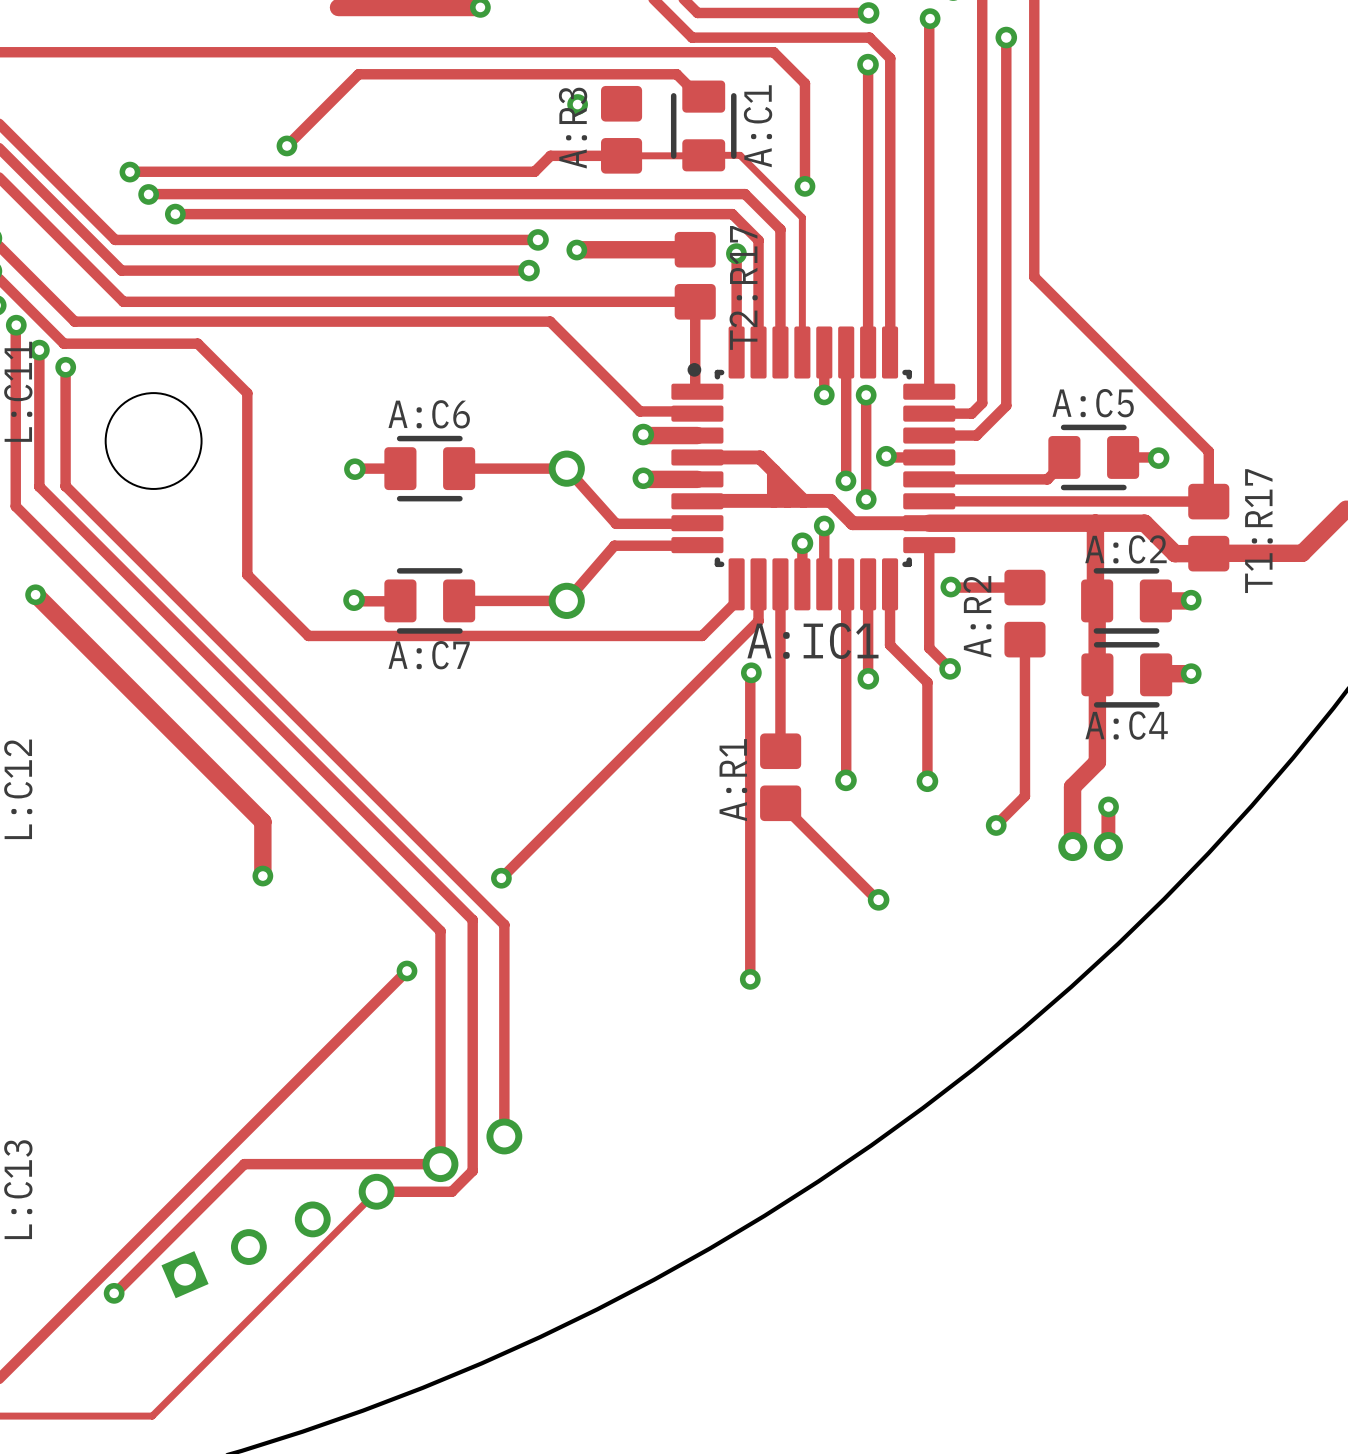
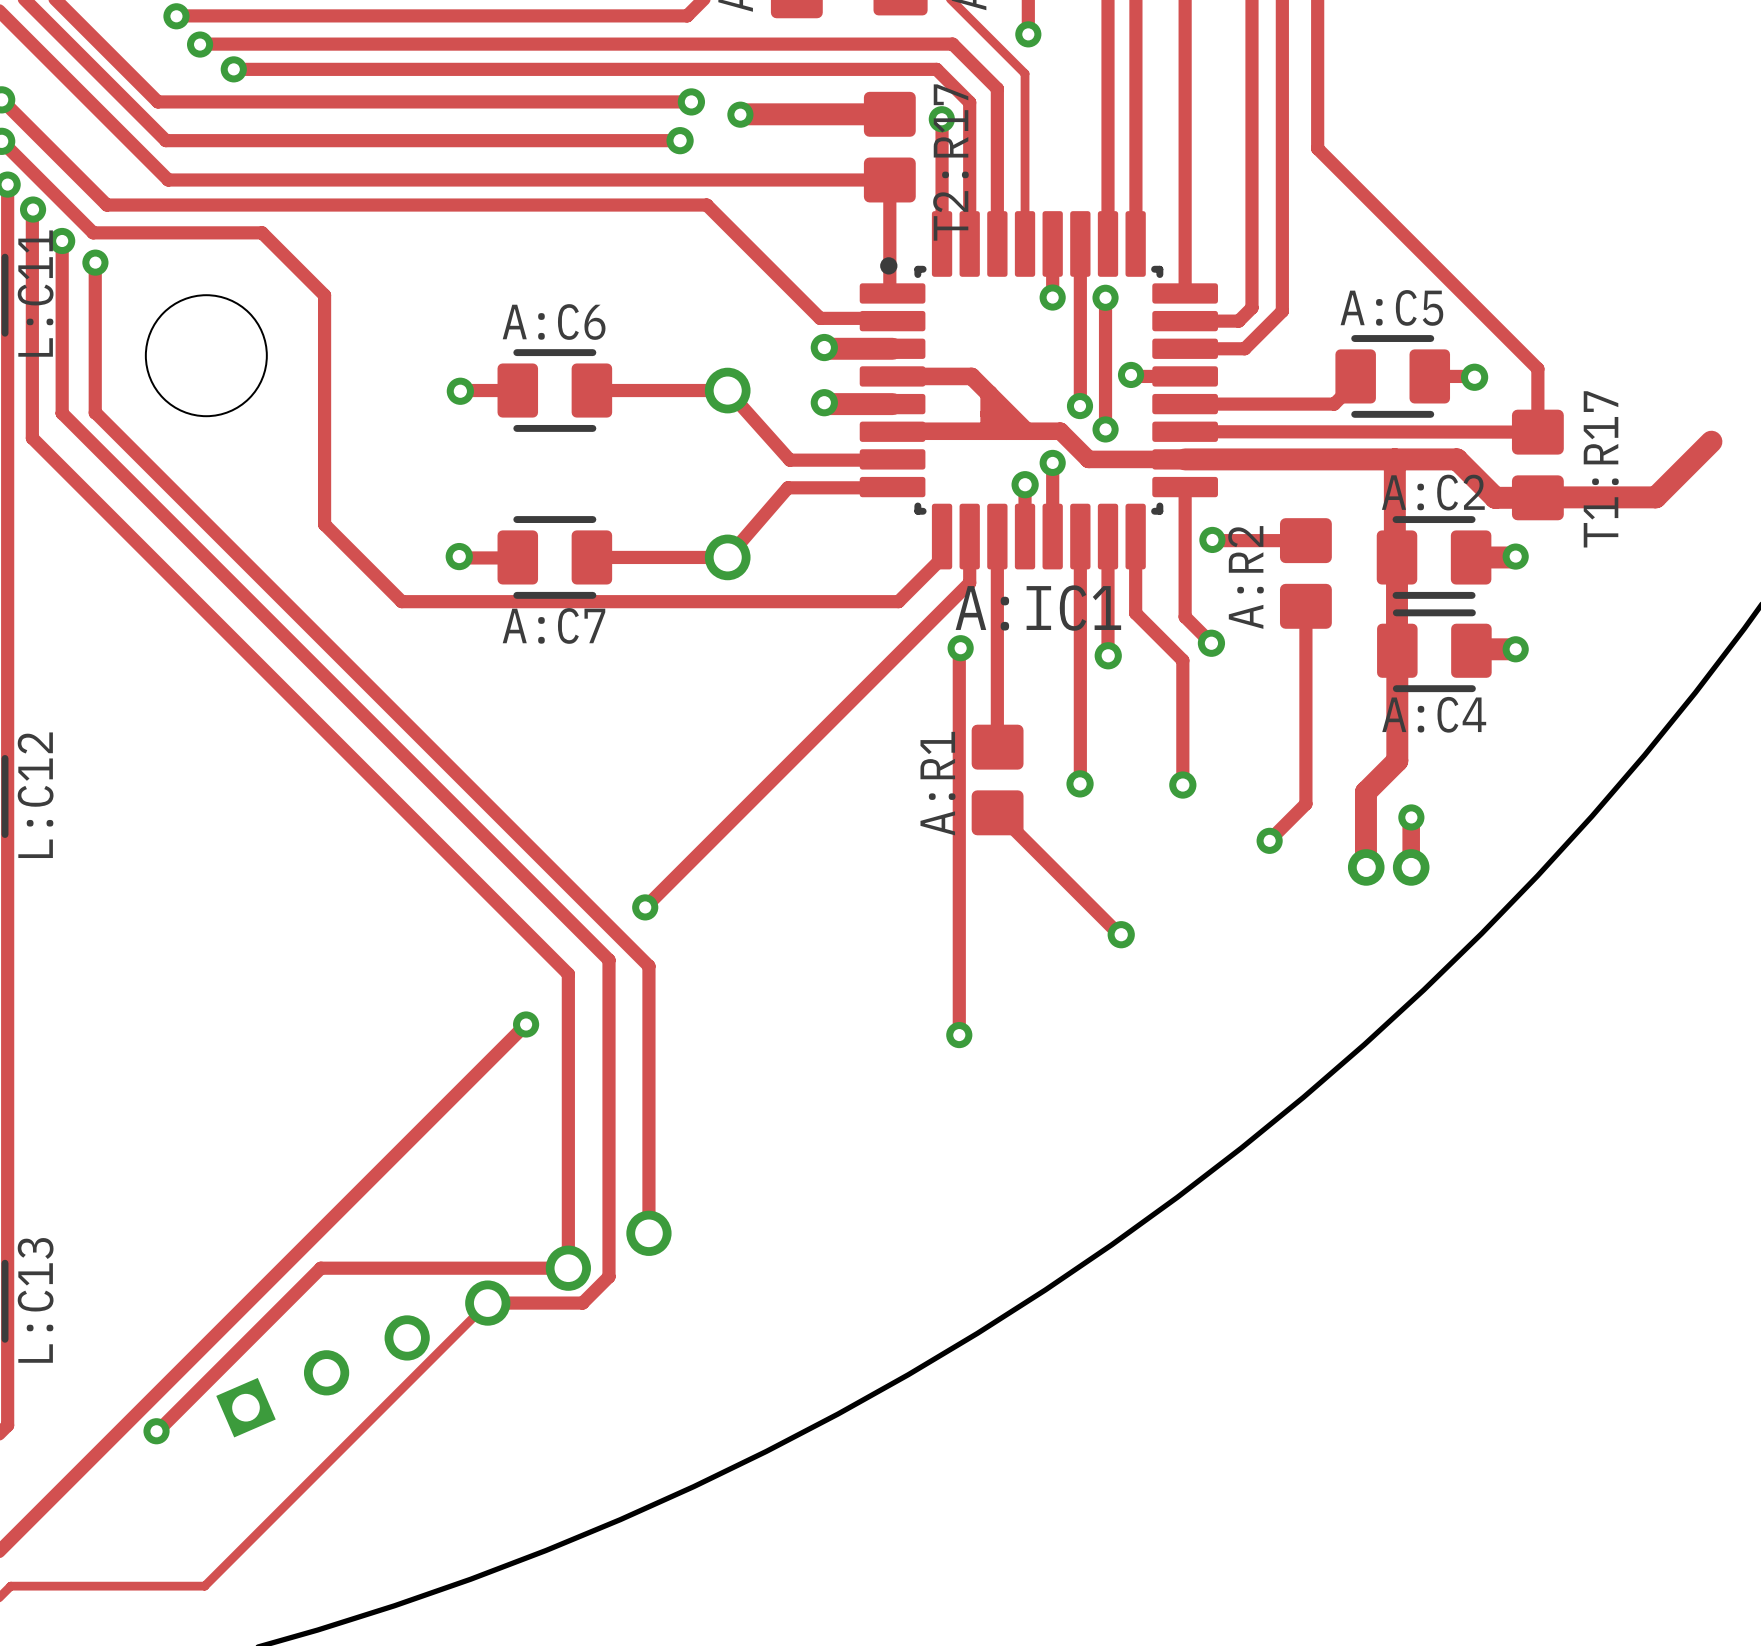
track: (35, 594) (262, 821) (262, 876) -> none
via: (35, 594) -> none
via: (262, 876) -> none

